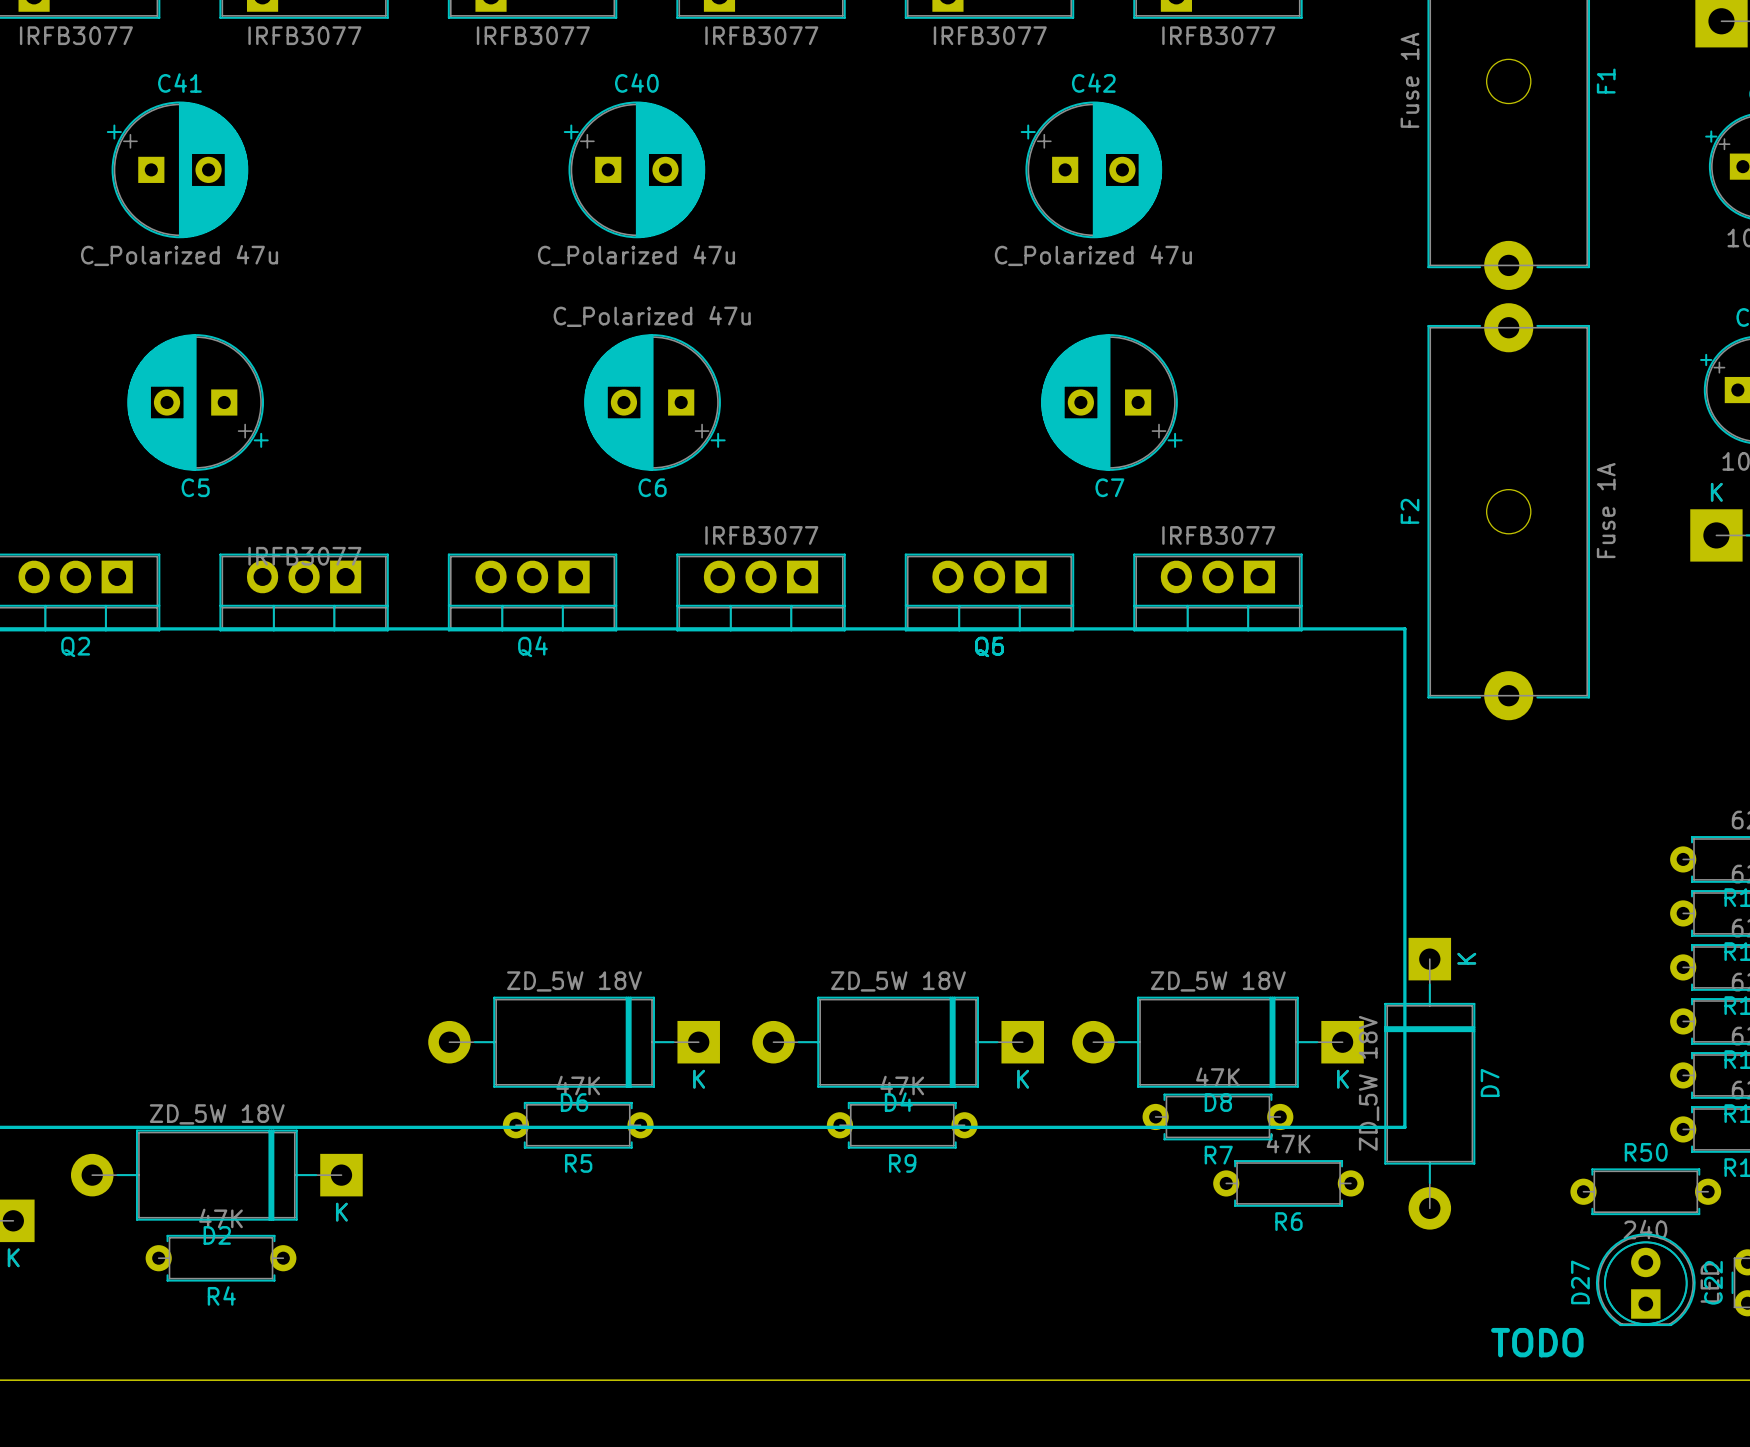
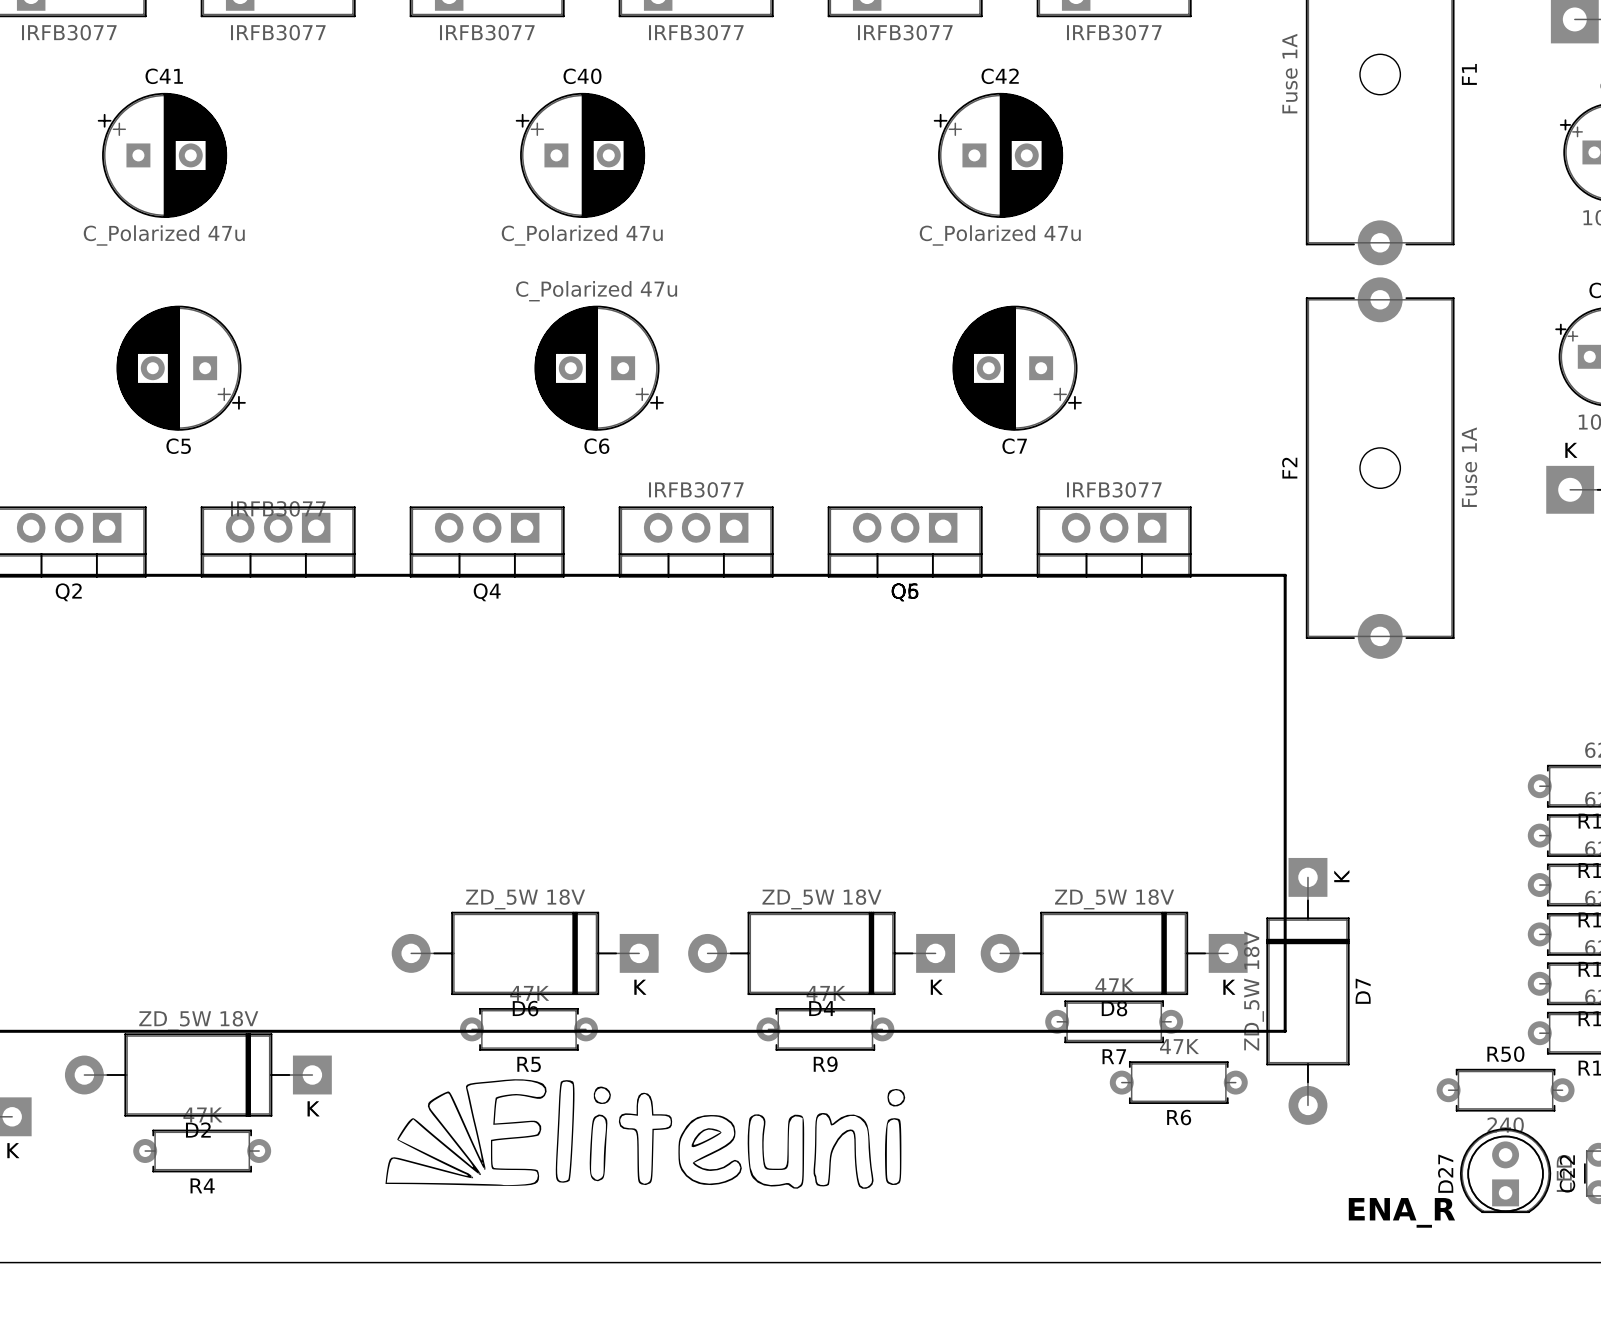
drawing: none -> [385, 1079, 906, 1189]
text: none -> ENA_R (1401, 1212)
text: TODO (1537, 1342) -> none

